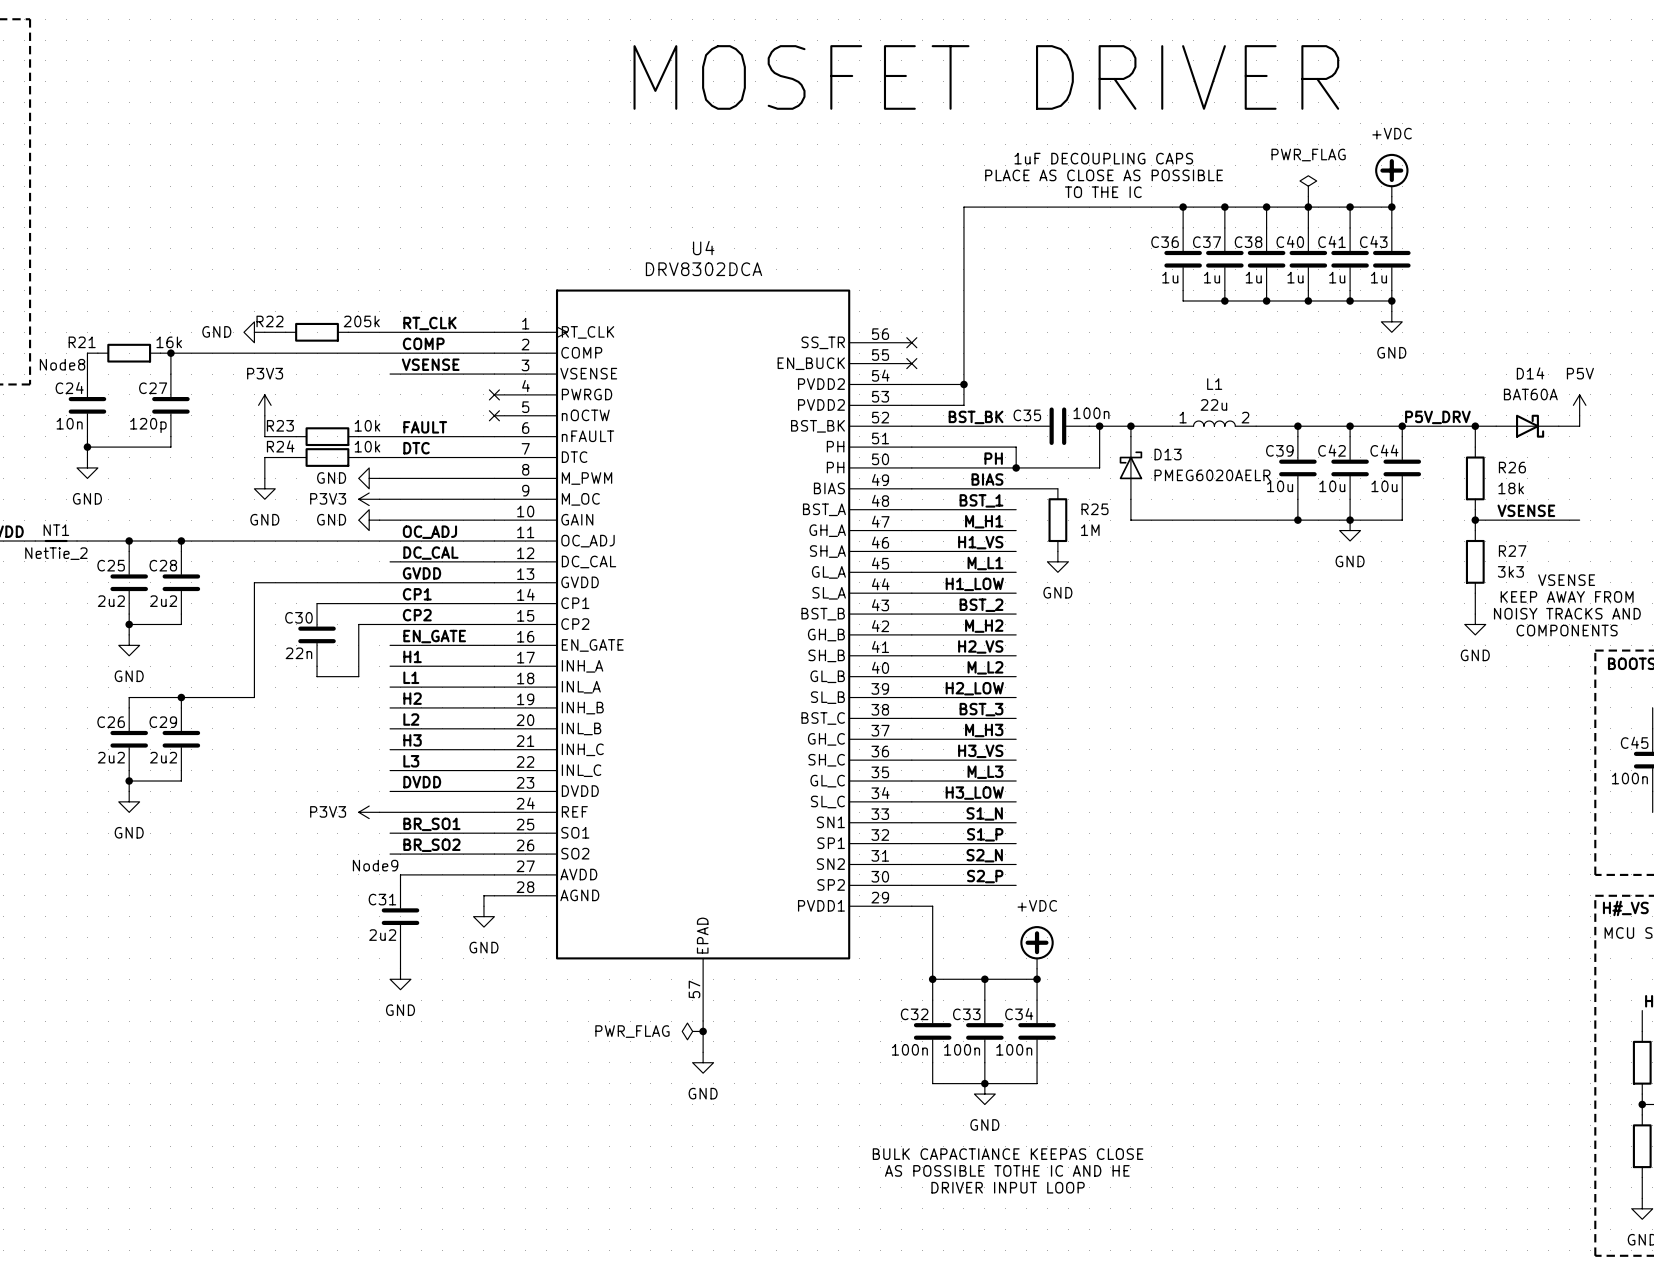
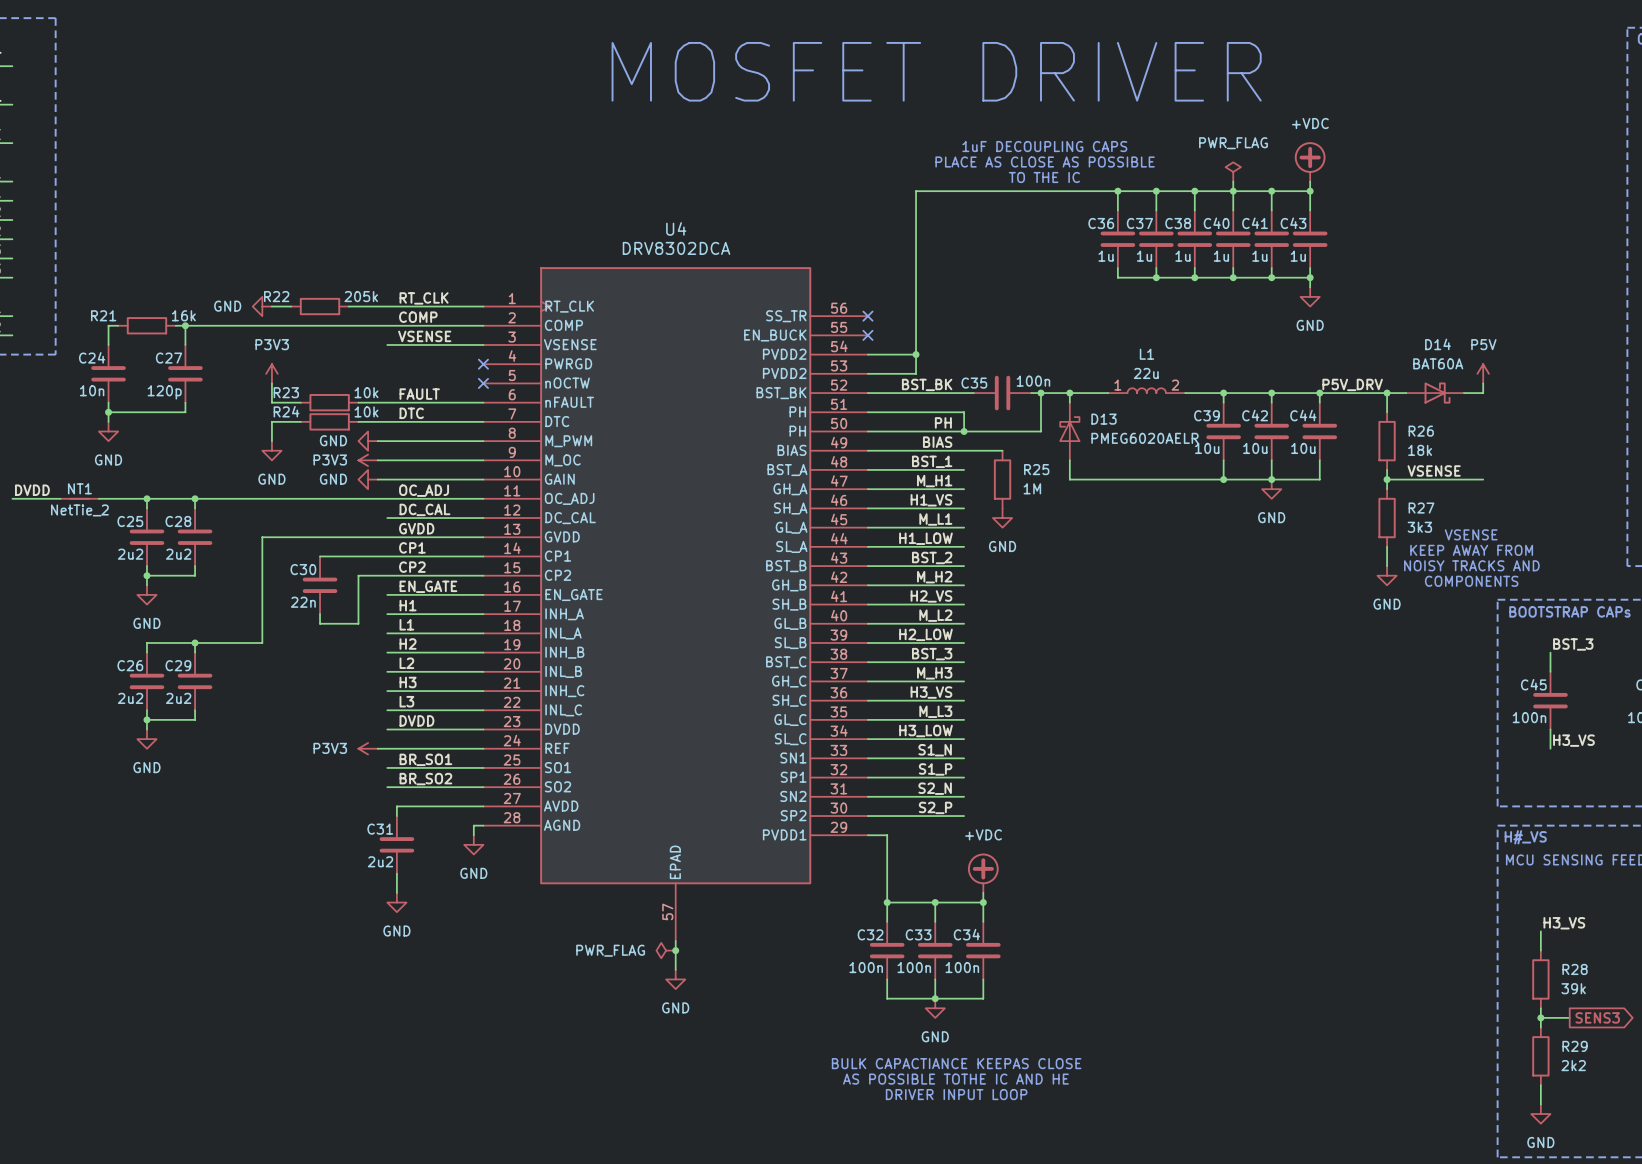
label: Node8 (62, 364) -> none
label: Node9 (375, 865) -> none

